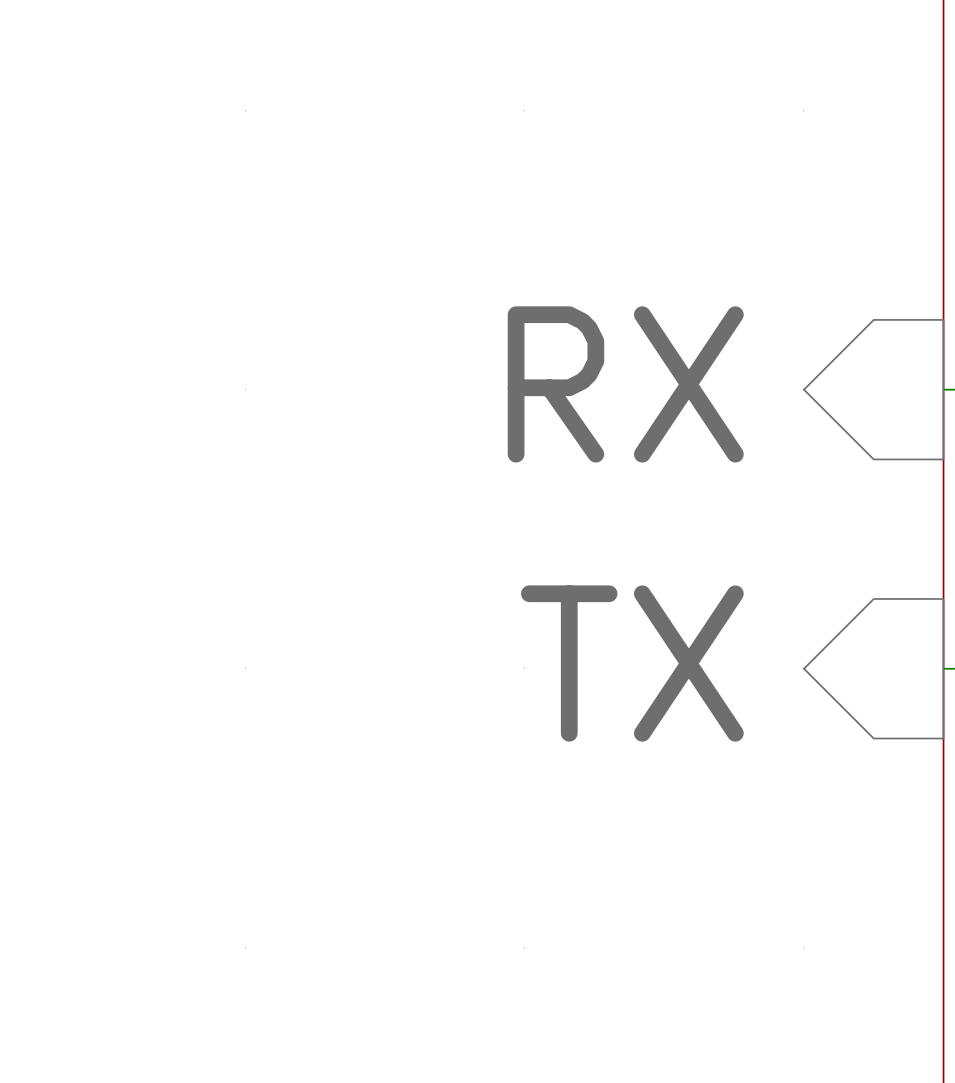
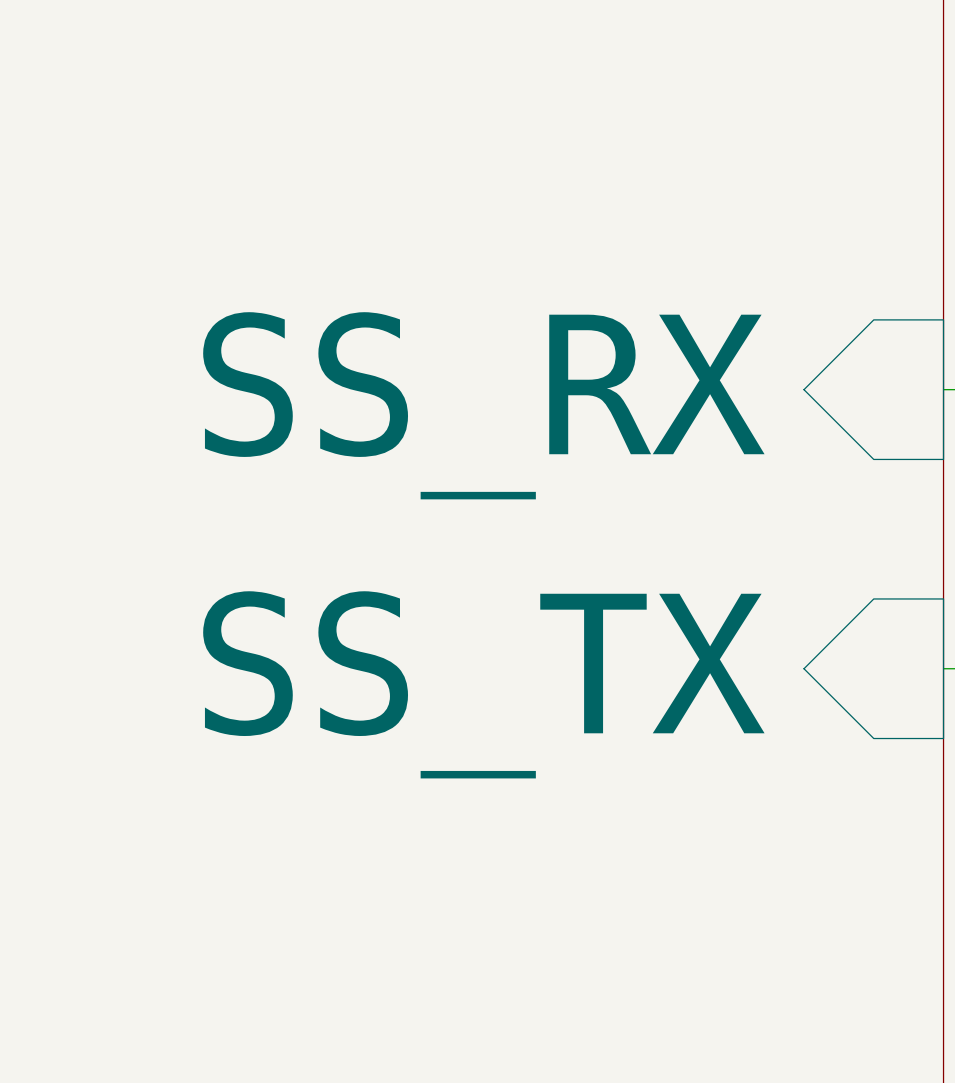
sheet pin: RX (625, 384) -> SS_RX (483, 405)
sheet pin: TX (632, 663) -> SS_TX (483, 684)

